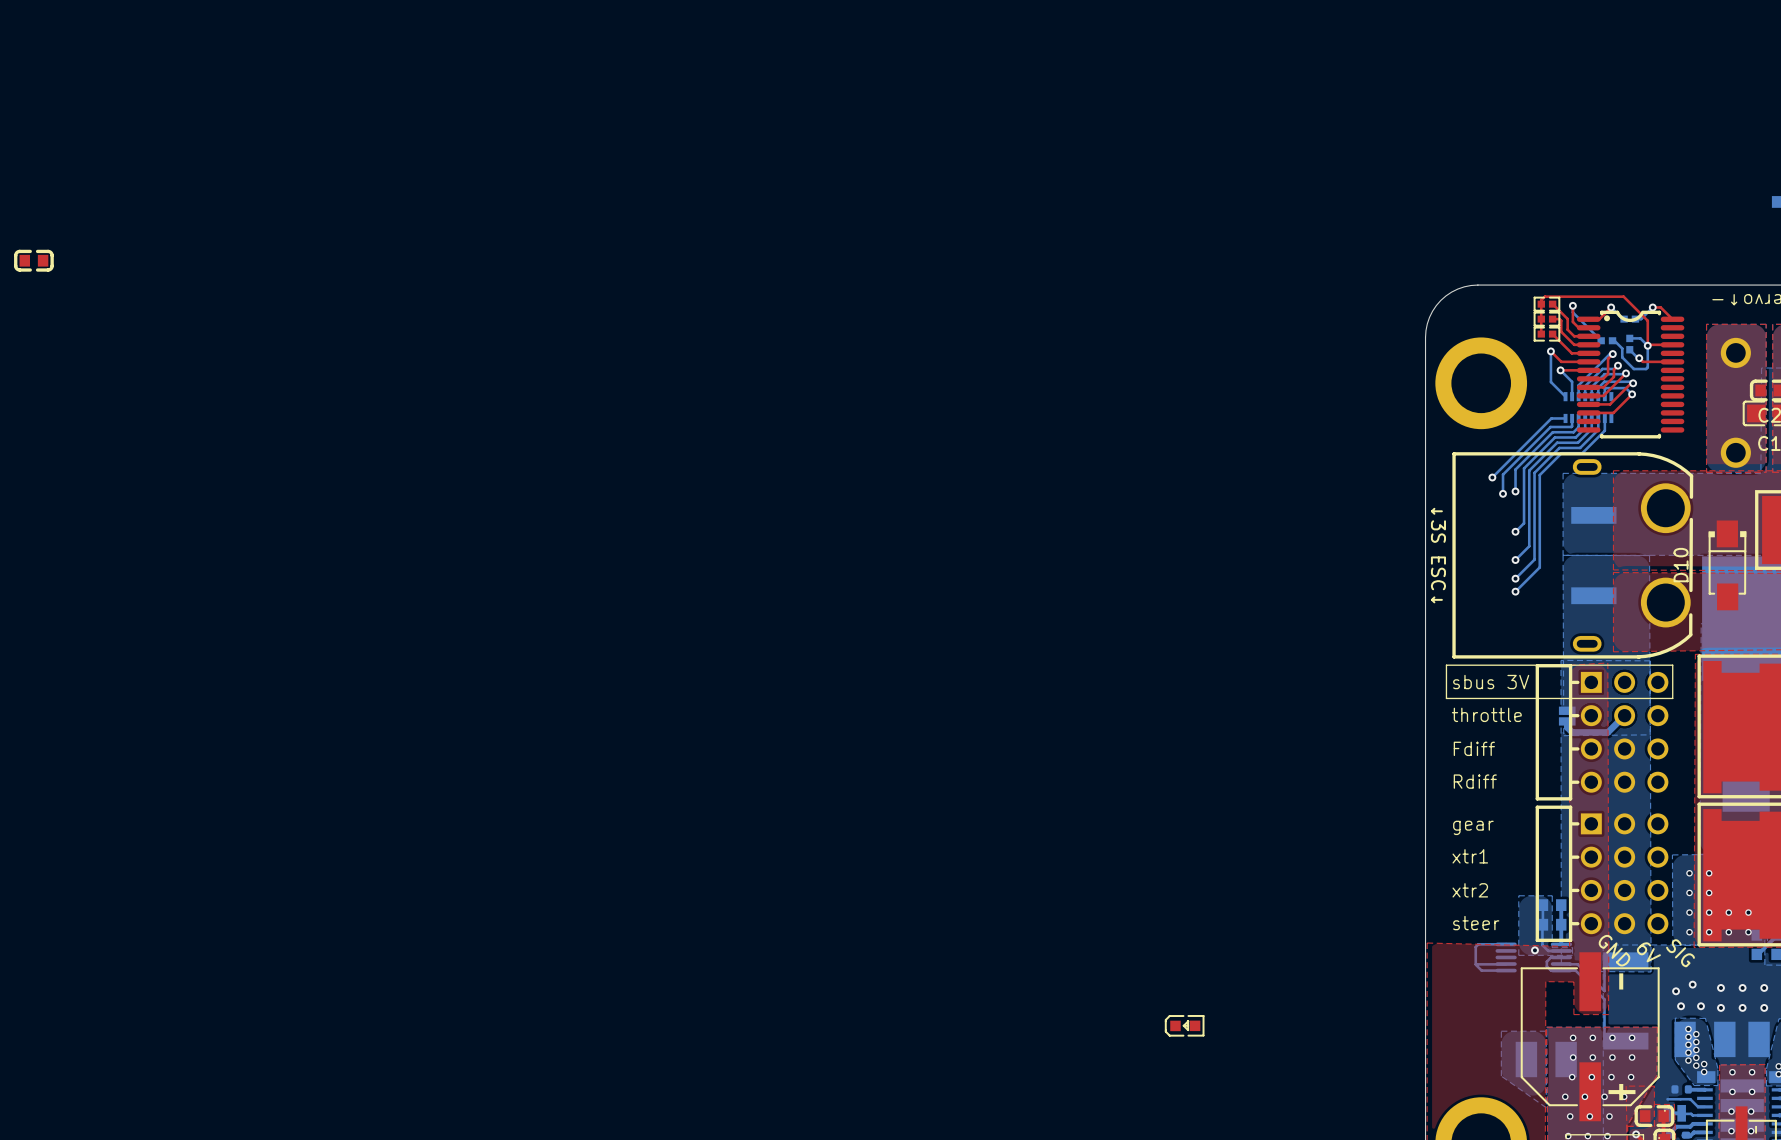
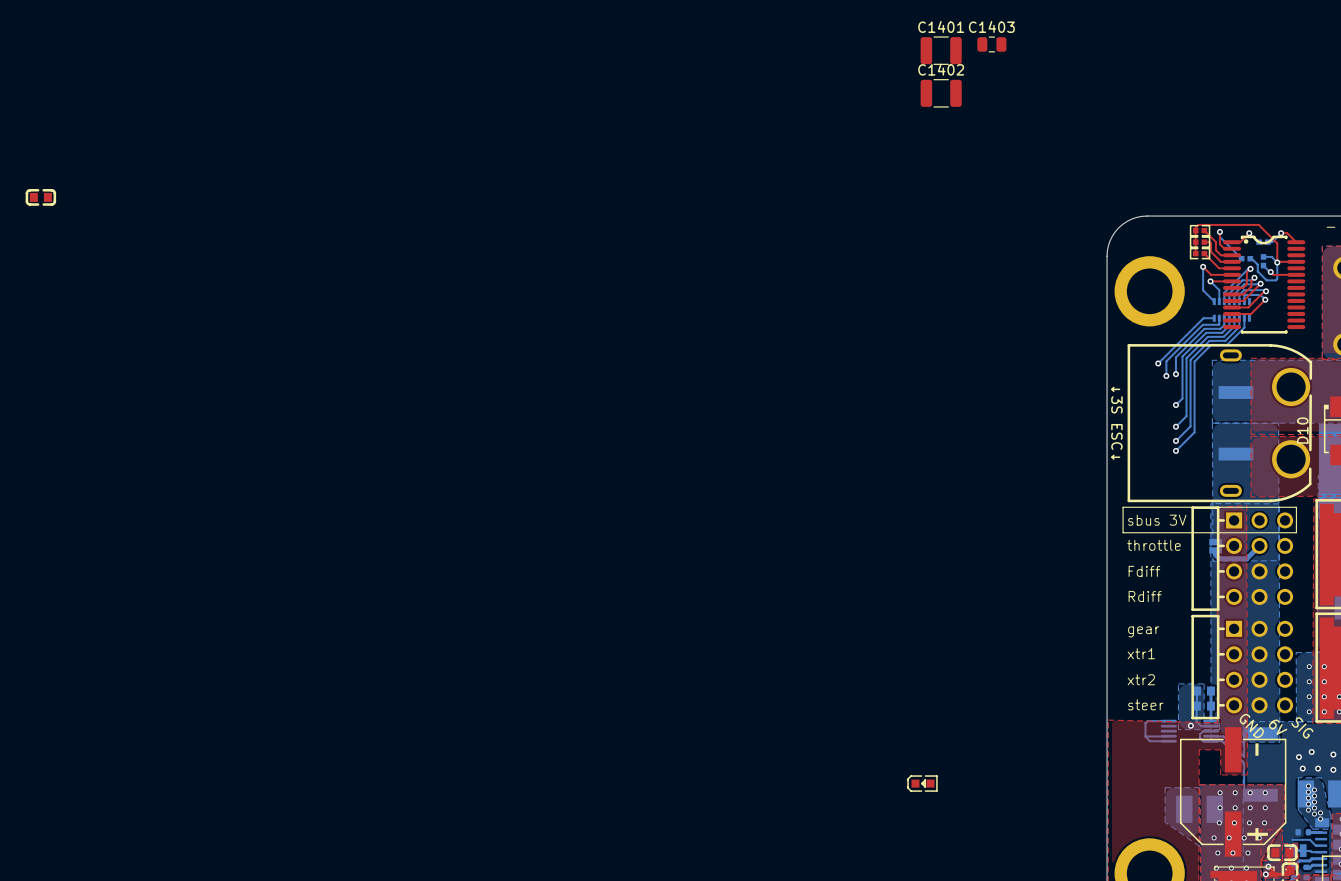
C1403: none -> (991, 44)
C1401: none -> (941, 50)
C1402: none -> (941, 93)

